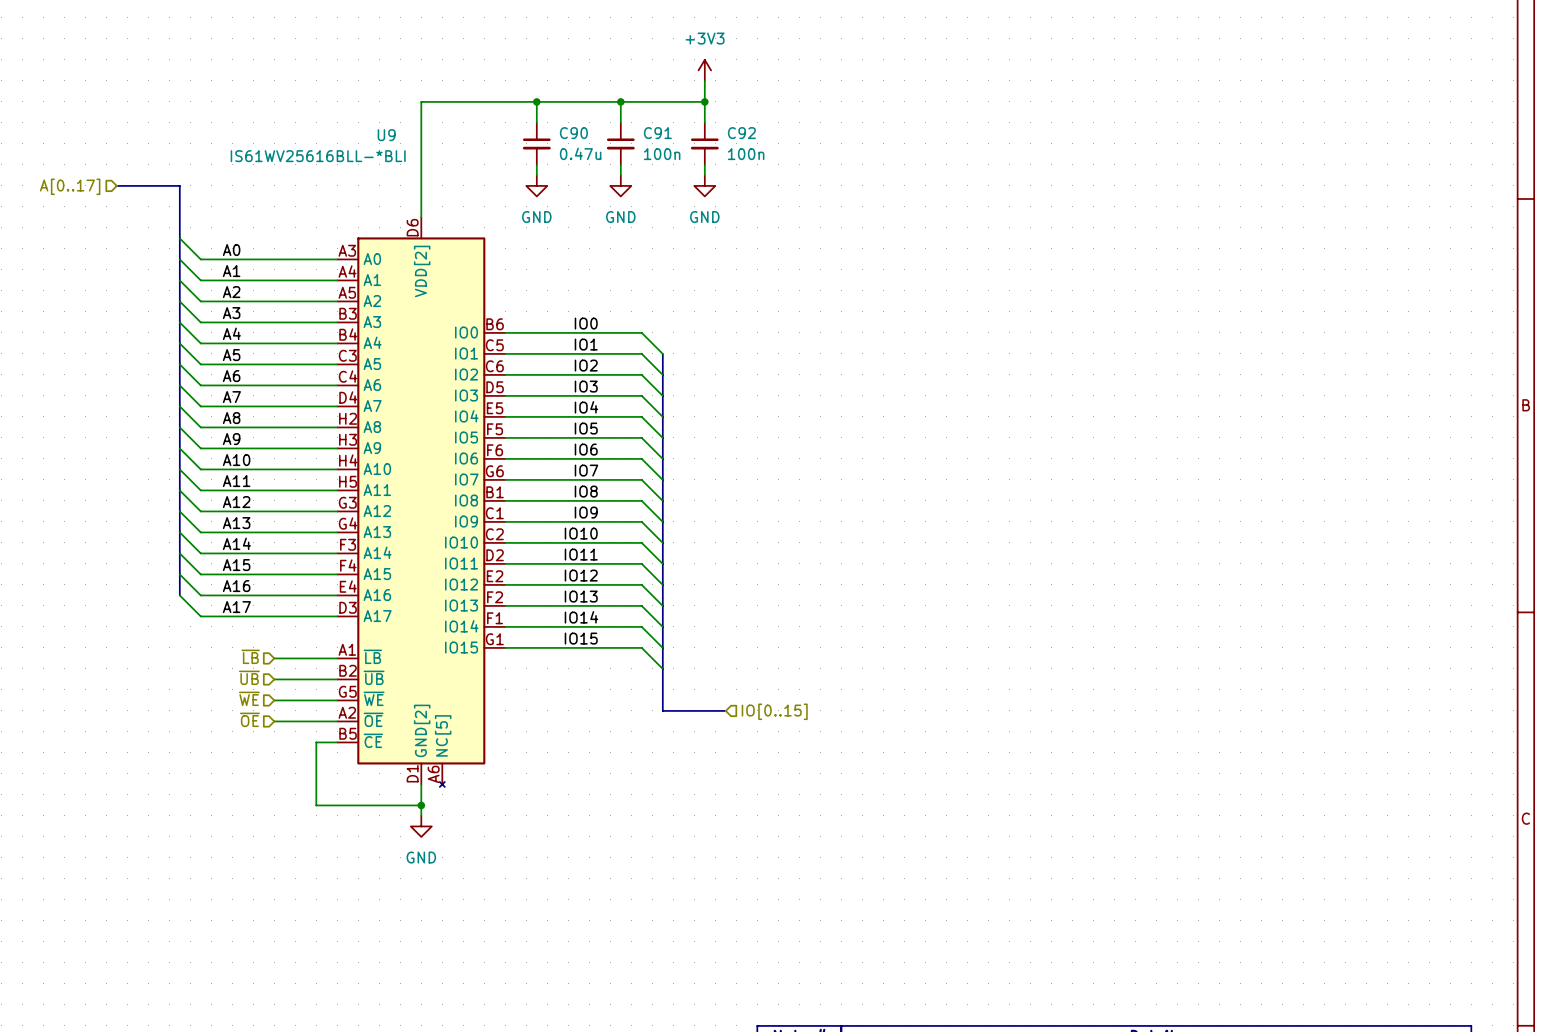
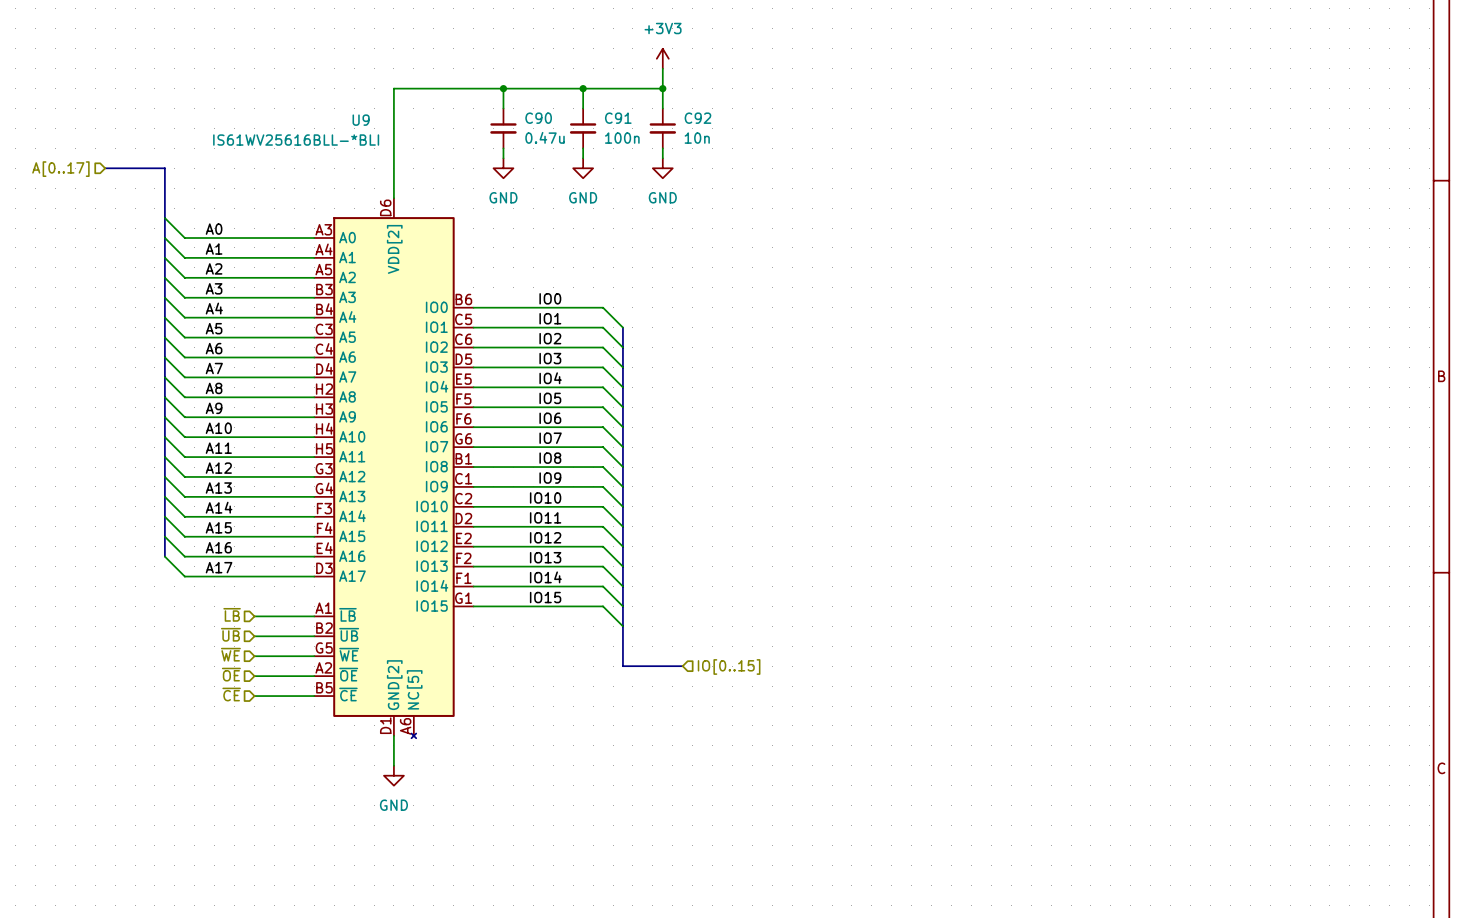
C92 value: 100n (746, 154) -> 10n (697, 138)
hierarchical label: none -> ~{CE} (231, 694)
wire: (316, 742) (316, 805) (421, 805) -> (294, 696) (254, 696)
junction: (421, 805) -> none

